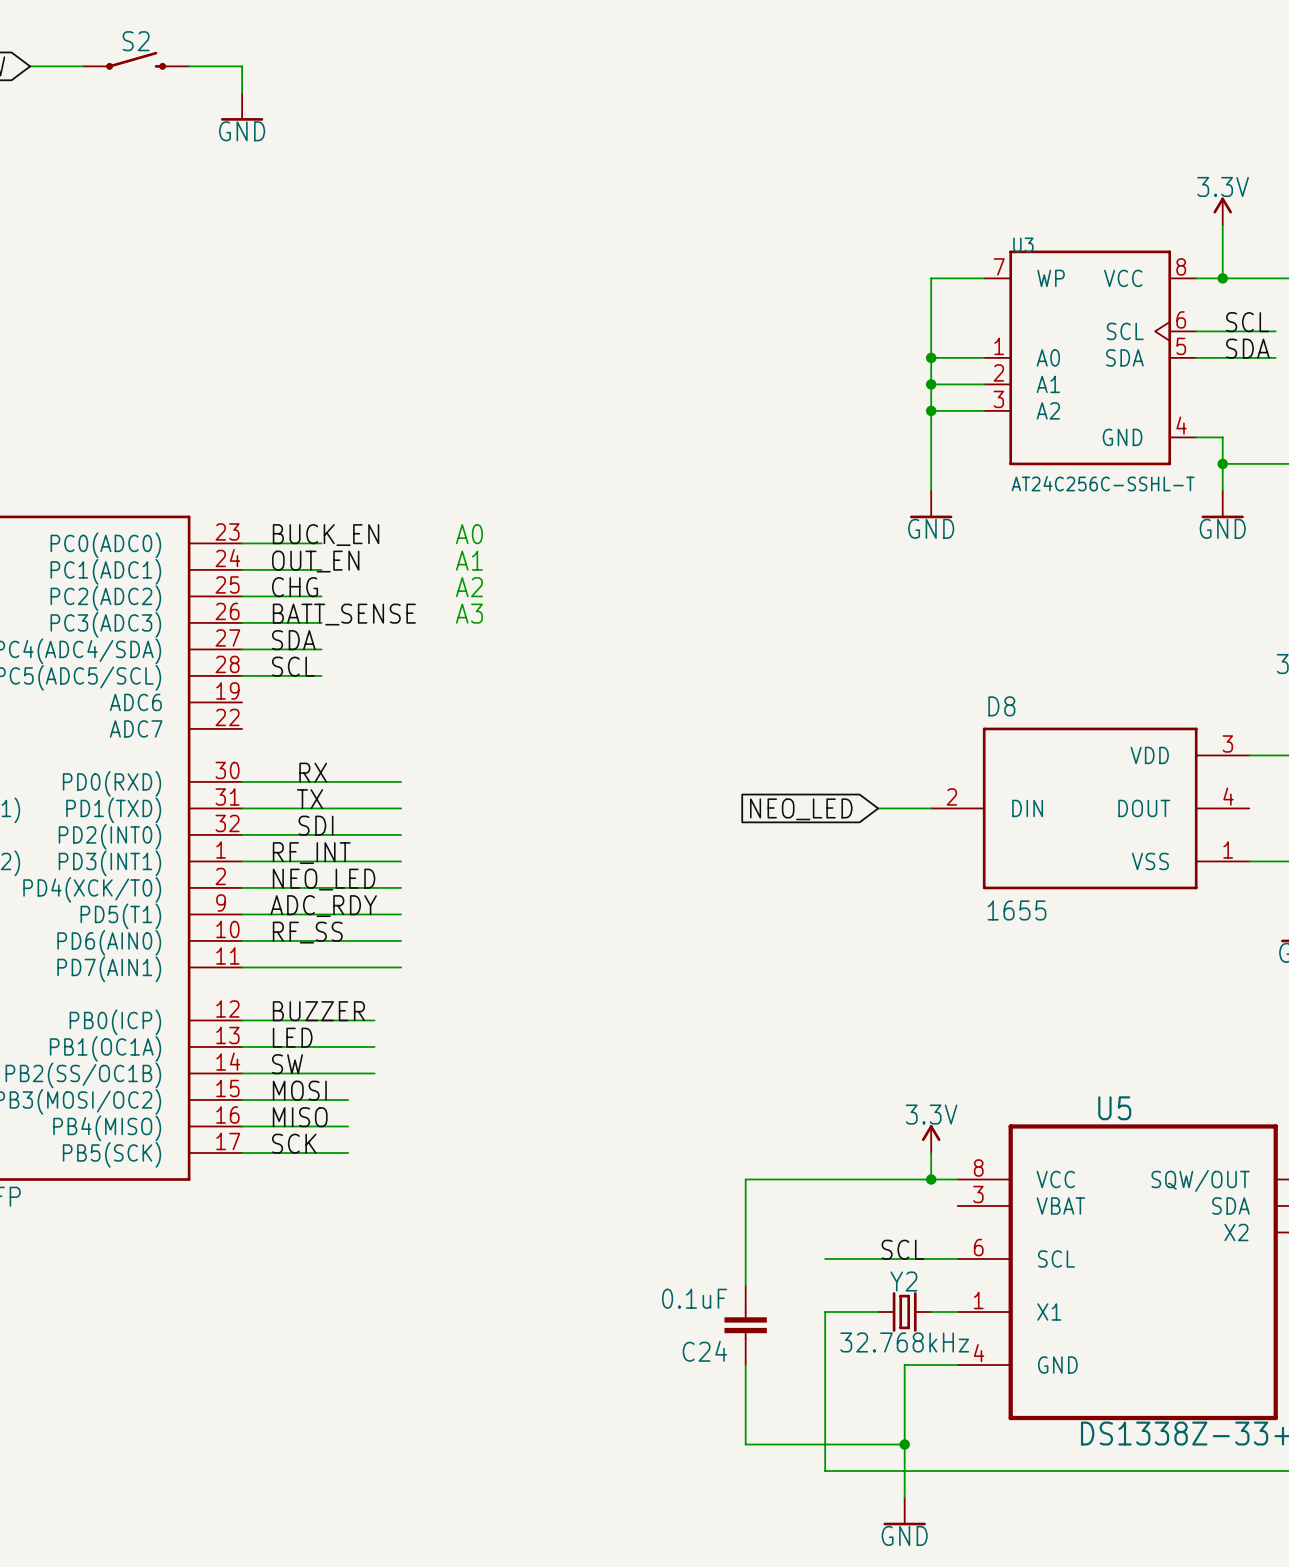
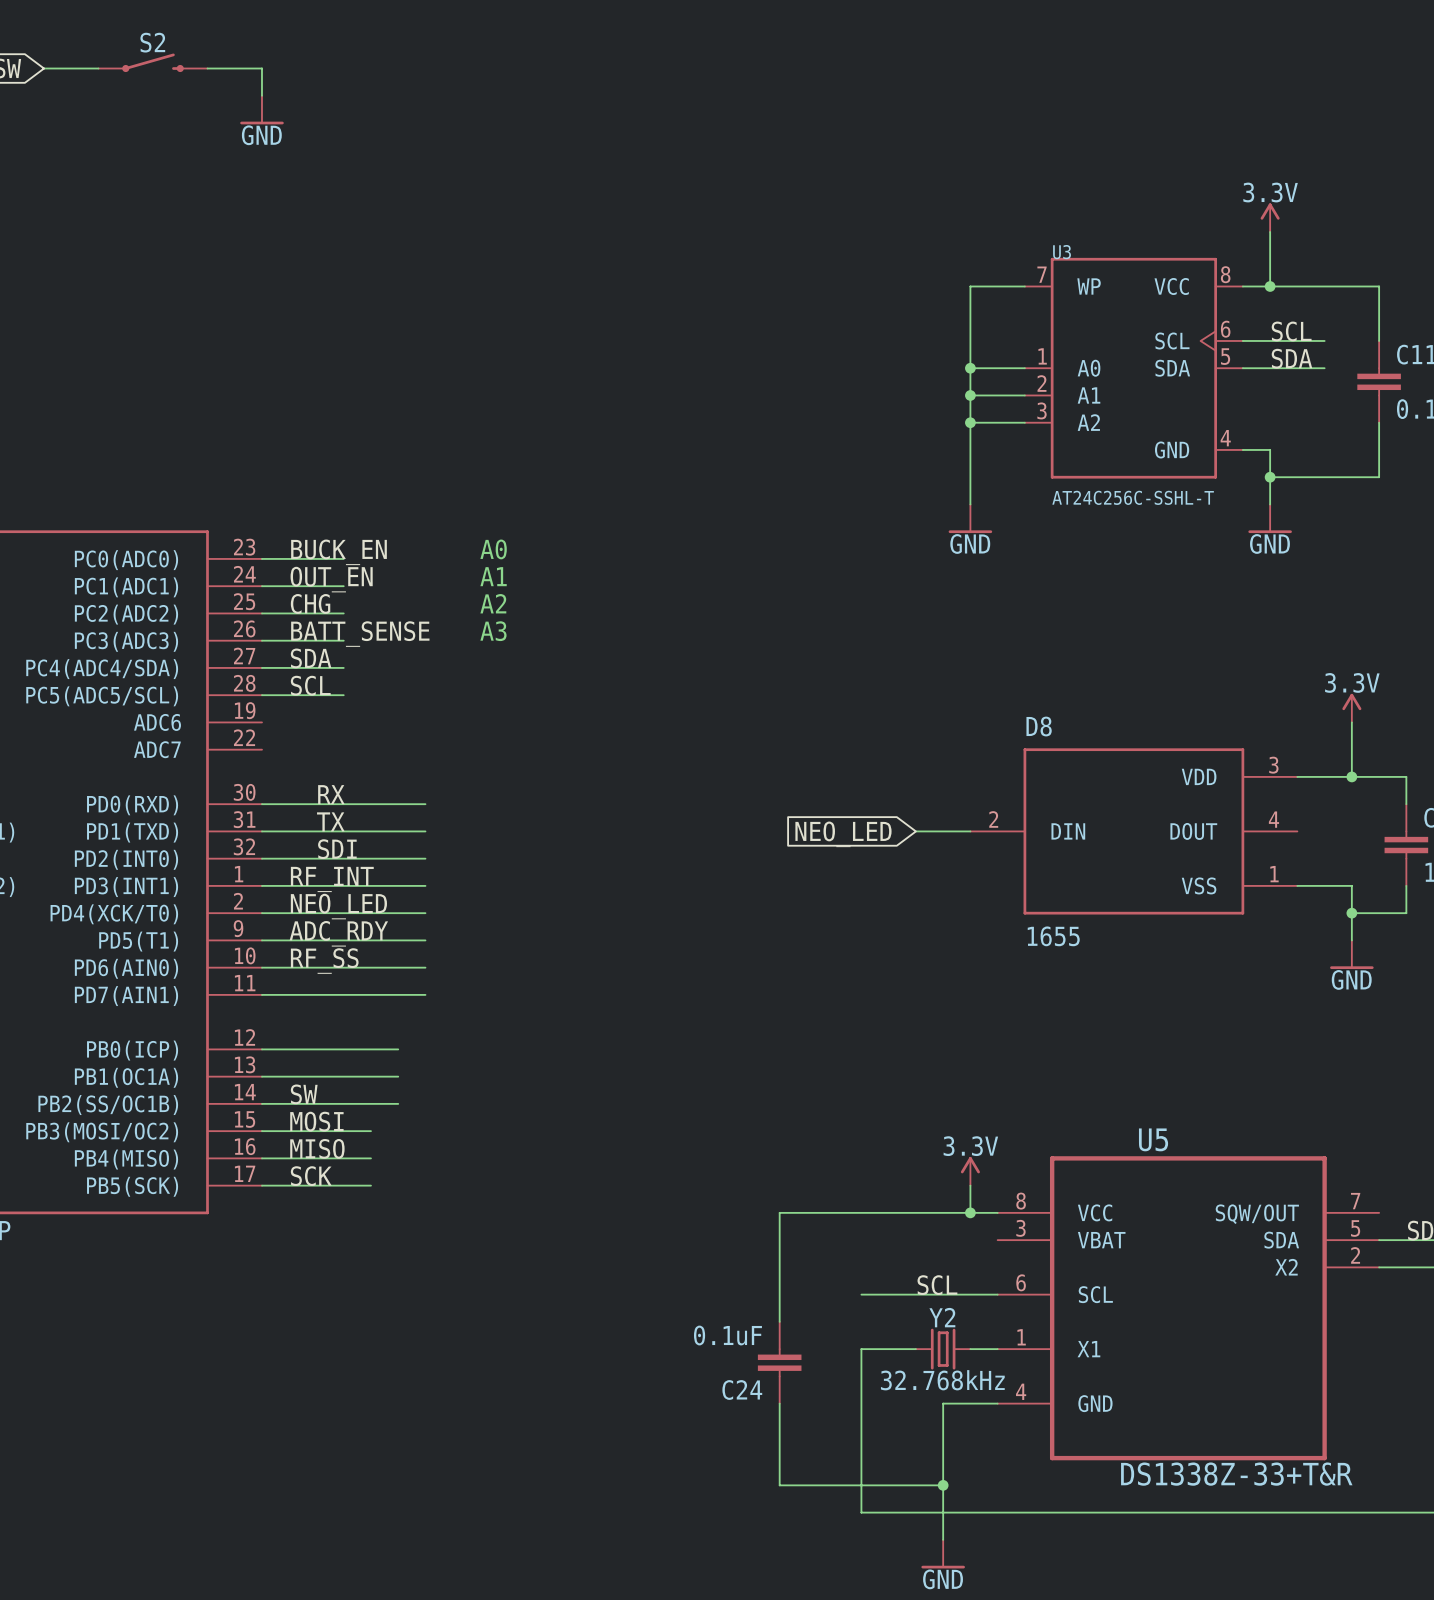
label: BUZZER (318, 1011) -> none
label: LED (292, 1037) -> none

